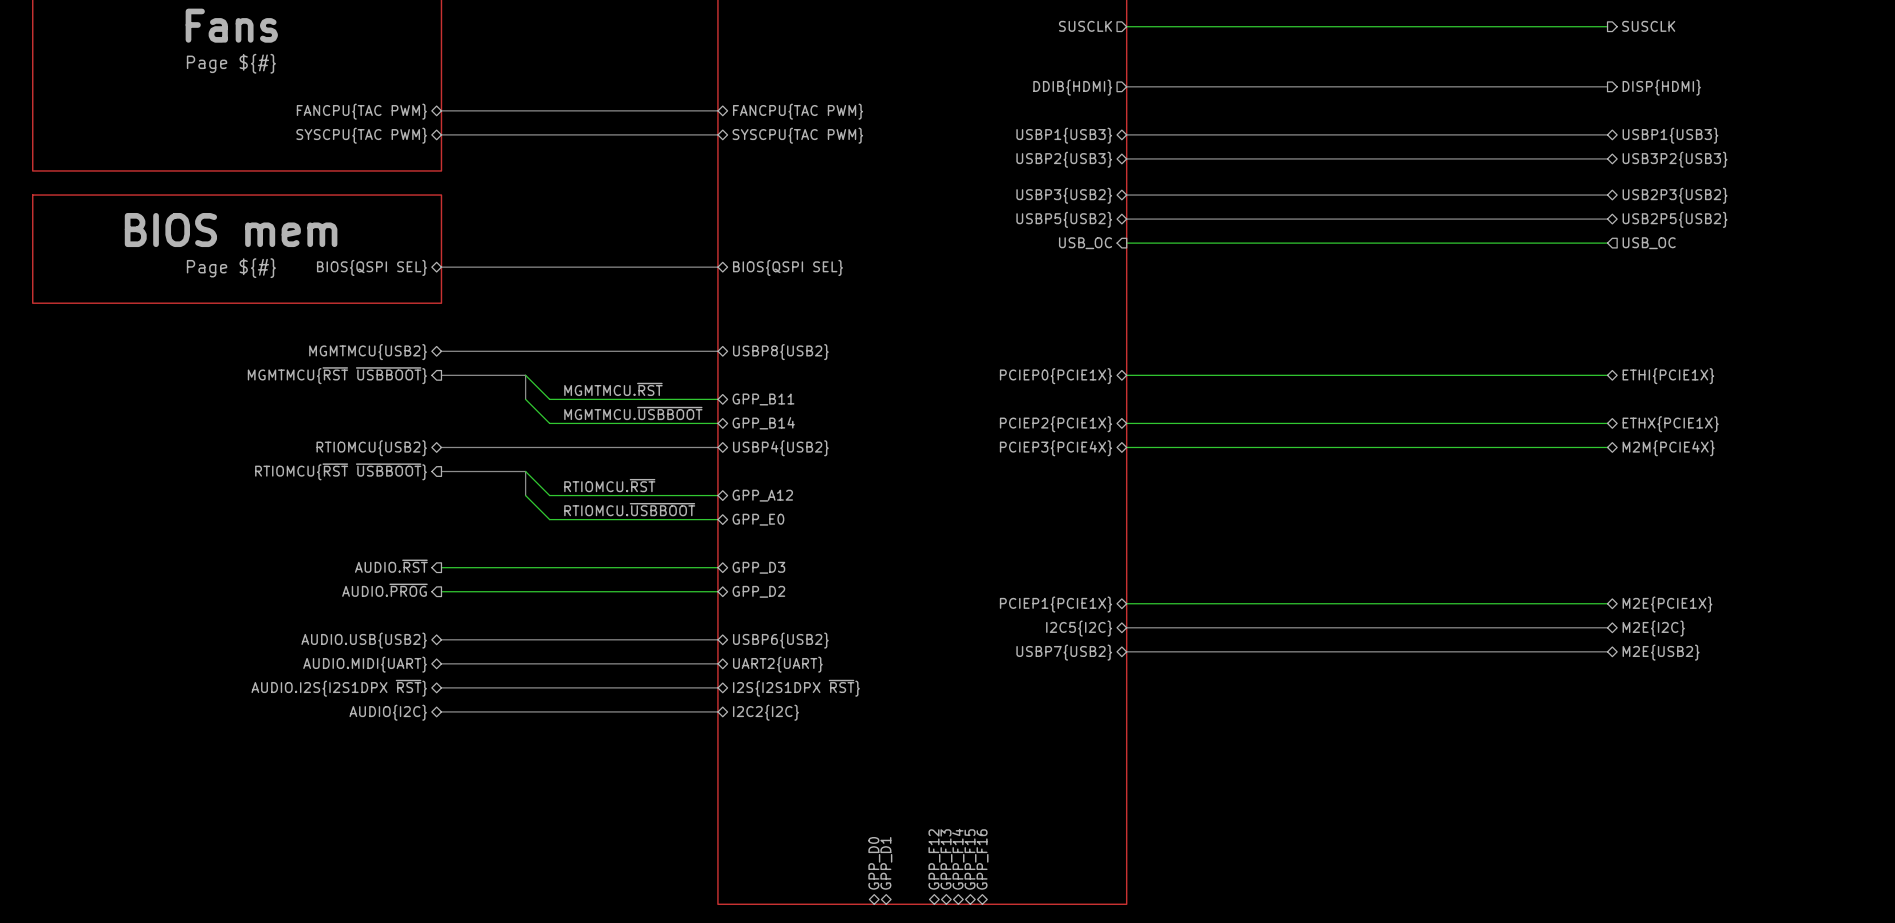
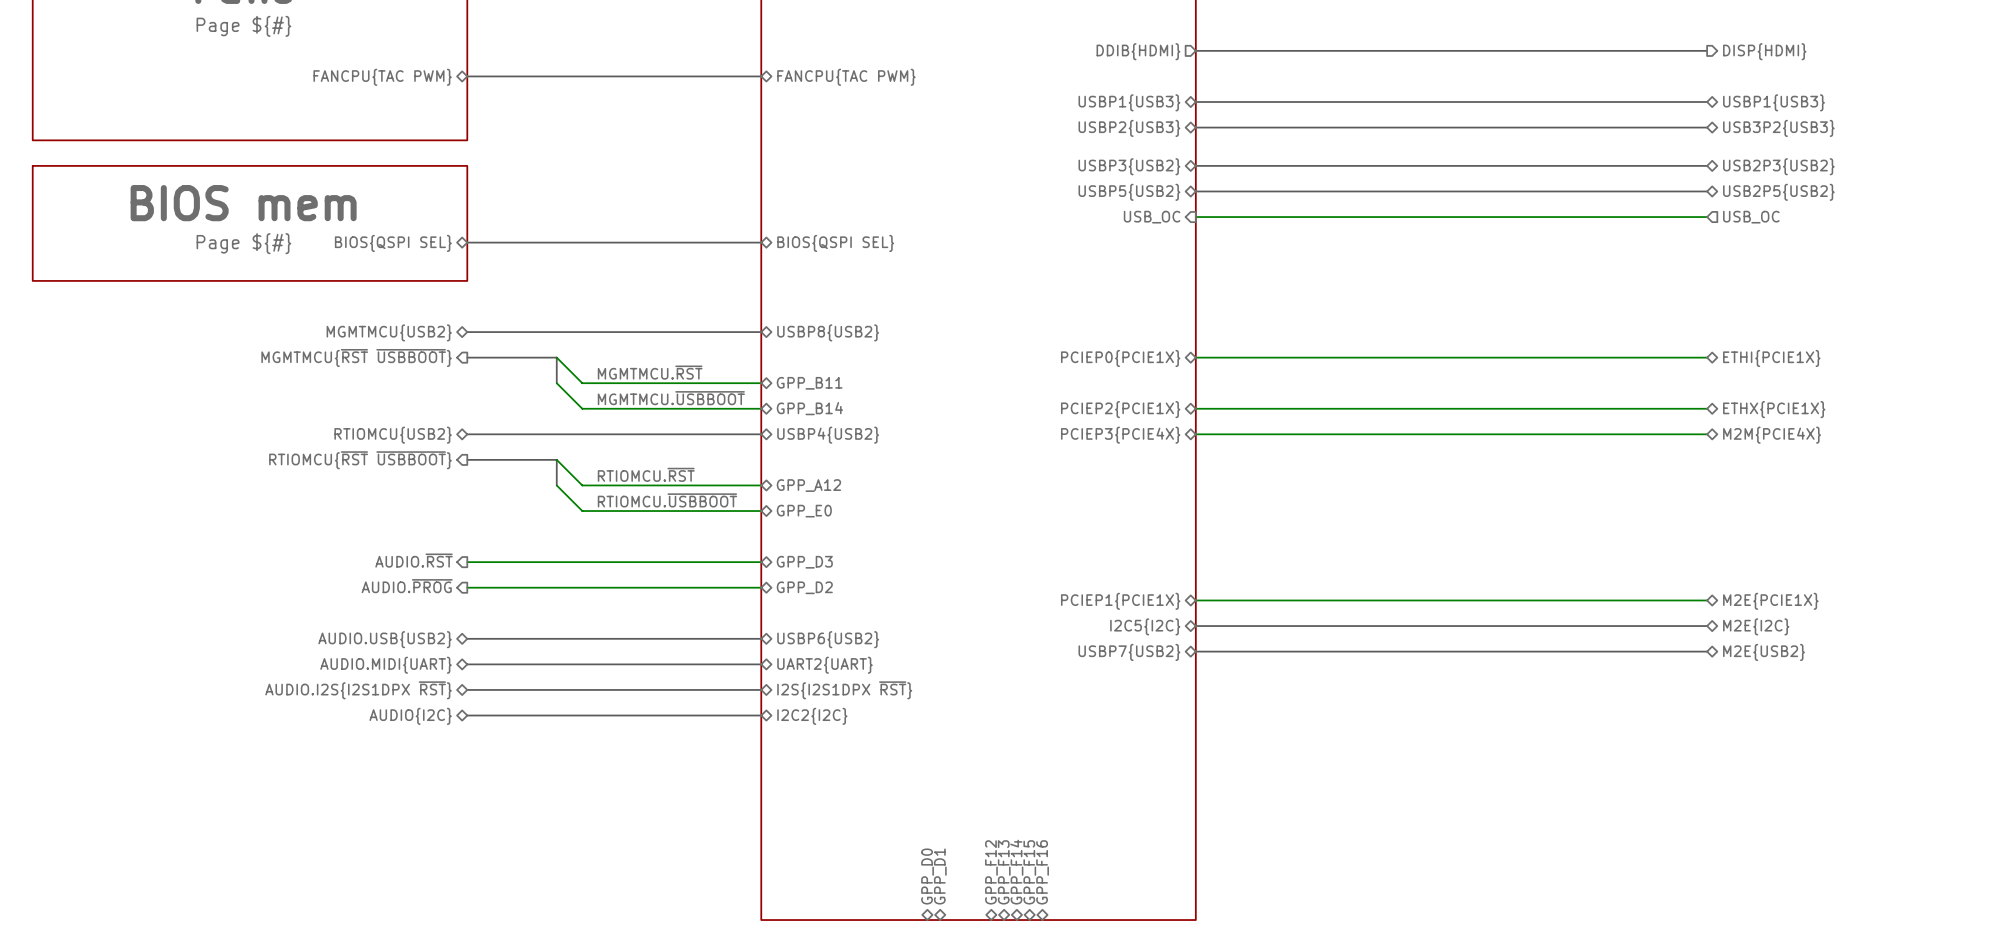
bus: (441, 134) (717, 134) -> none
sheet pin: SYSCPU{TAC PWM} (361, 135) -> none
sheet pin: SYSCPU{TAC PWM} (797, 135) -> none

